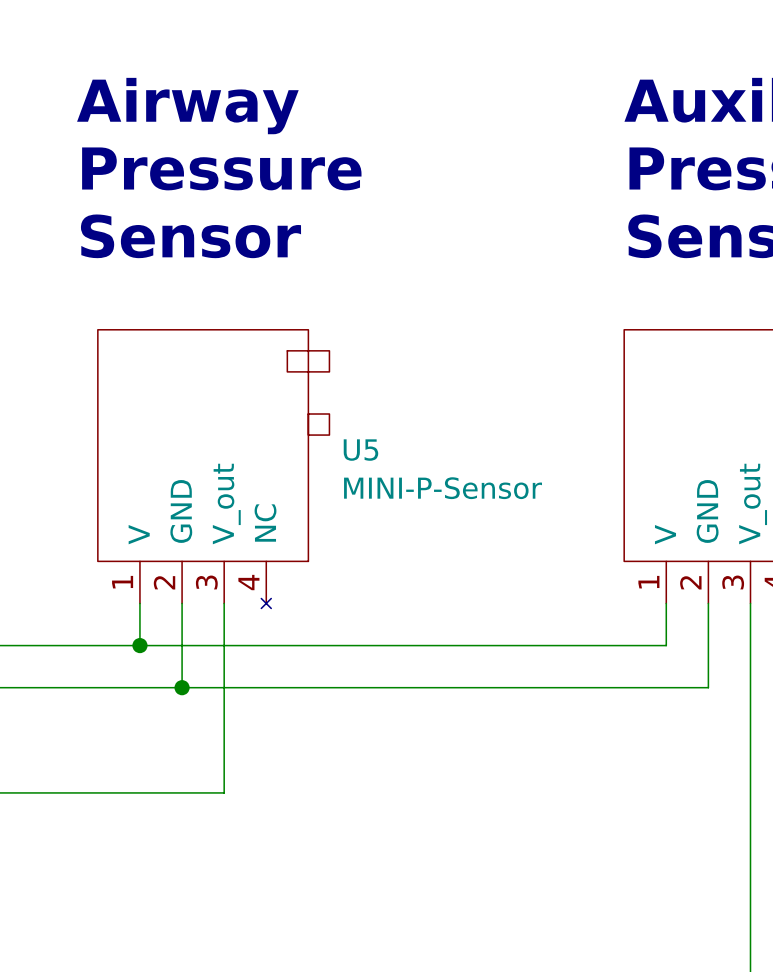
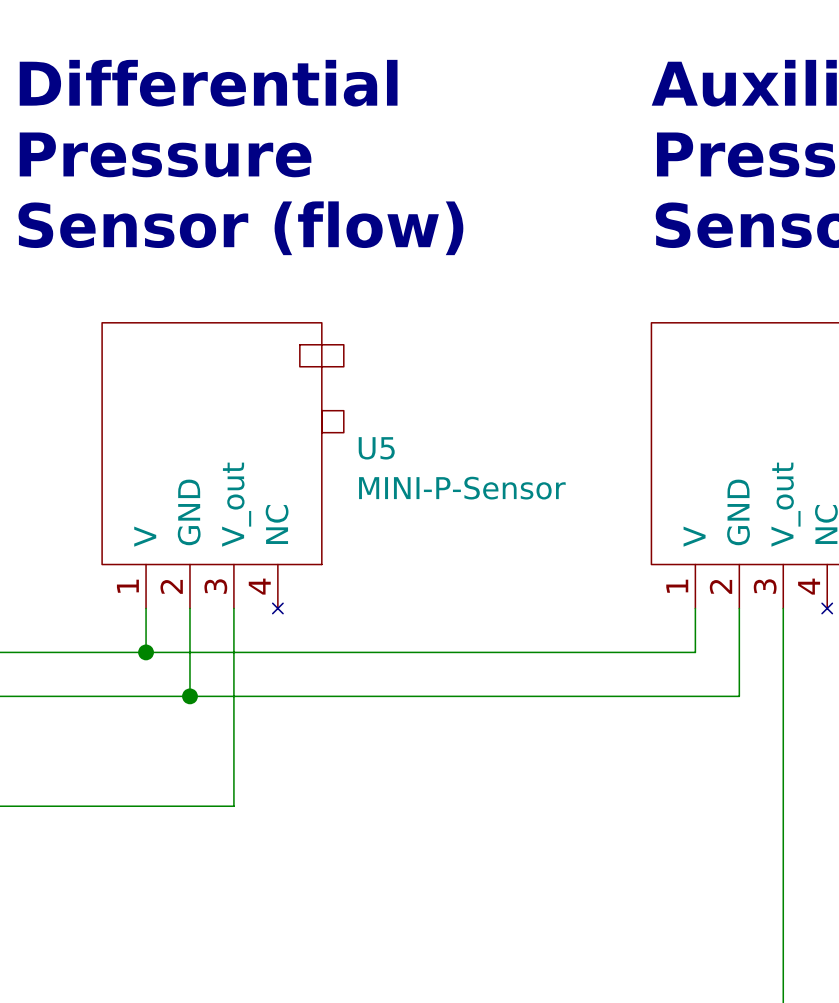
text: none -> Differential (208, 83)
text: Airway (187, 106) -> none
text position: Pressure (221, 168) -> Pressure (165, 154)
text: Sensor (191, 236) -> Sensor (flow) (240, 228)

